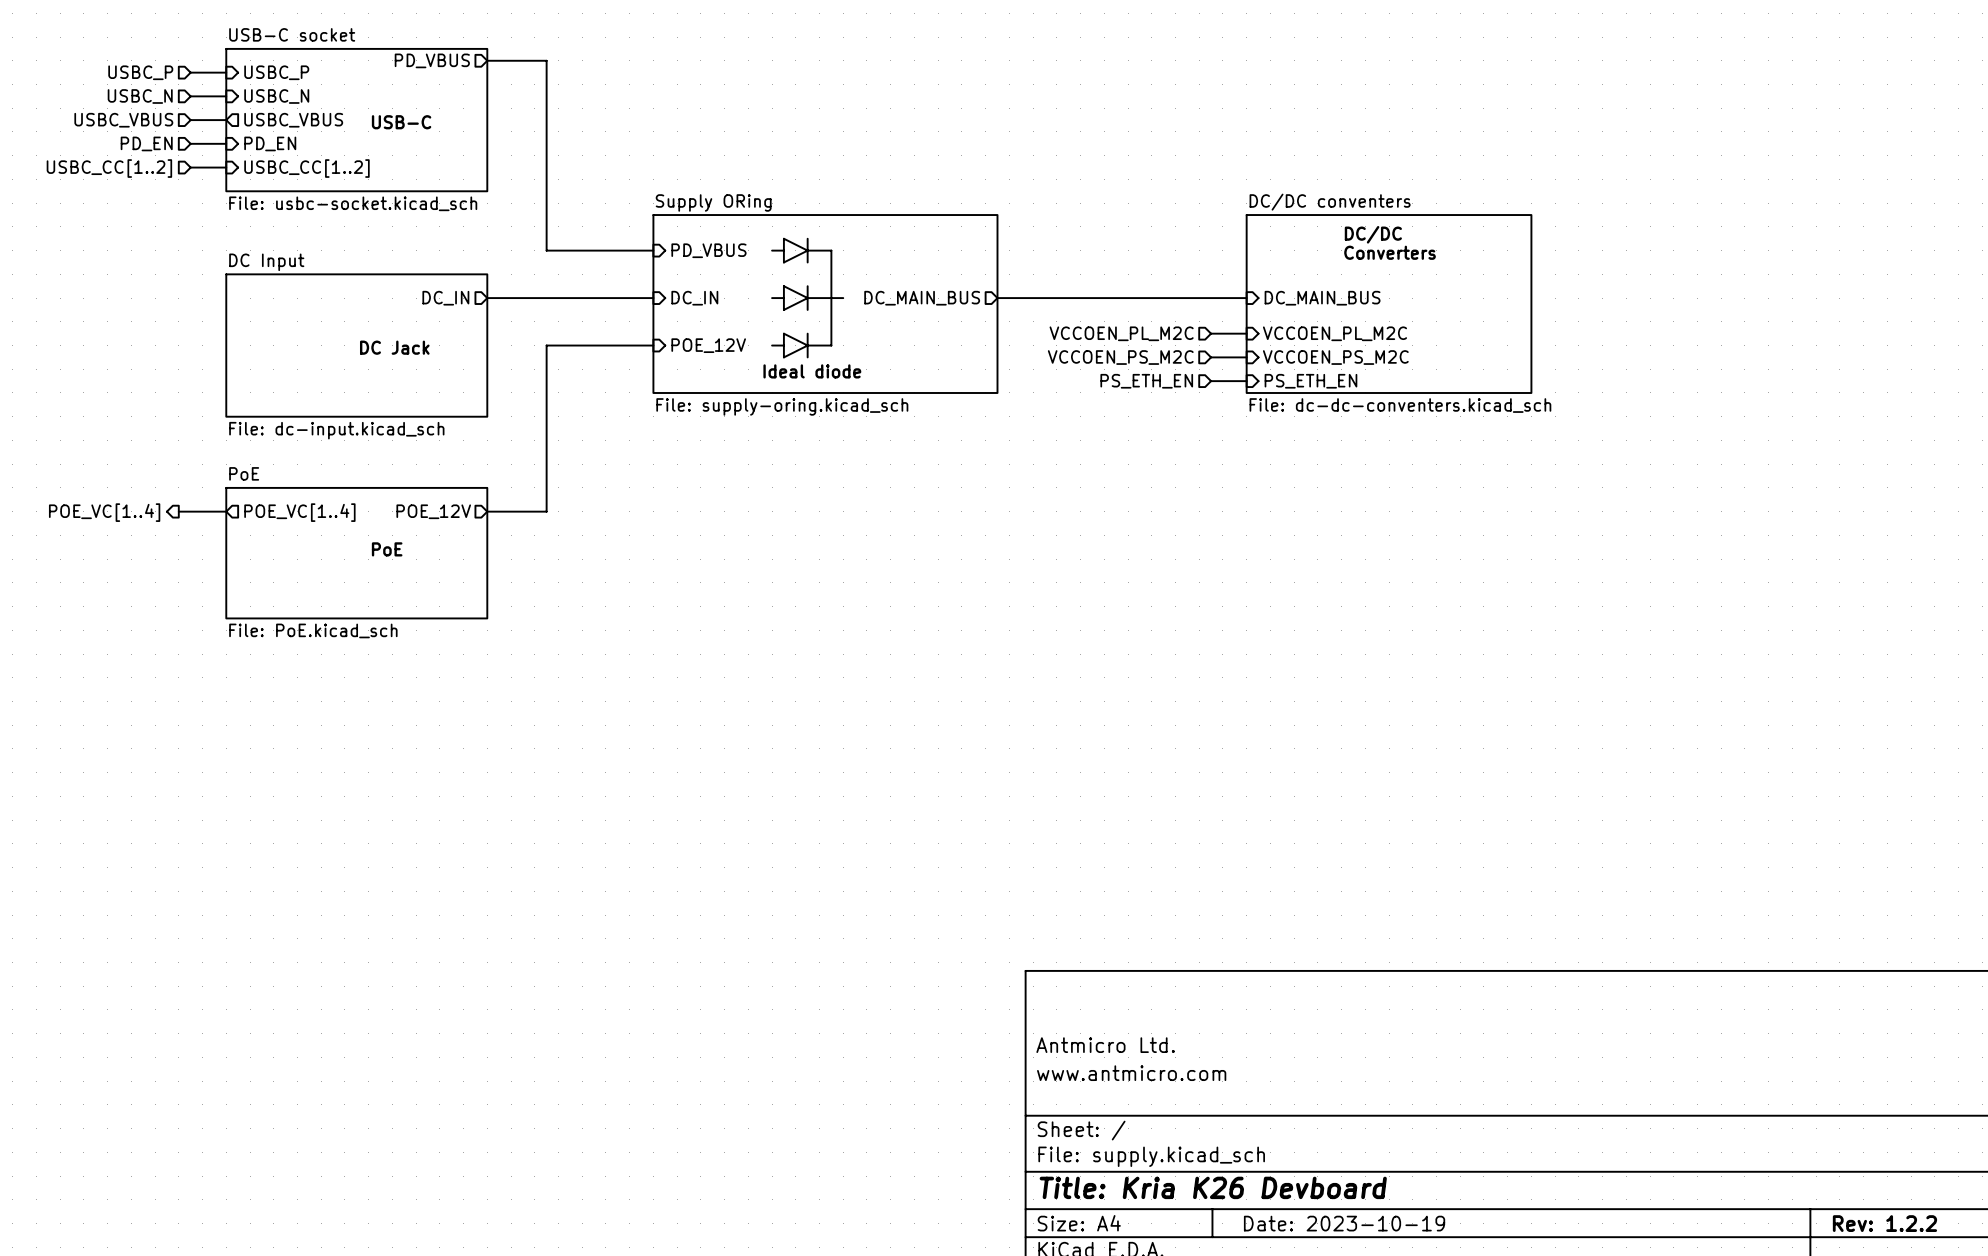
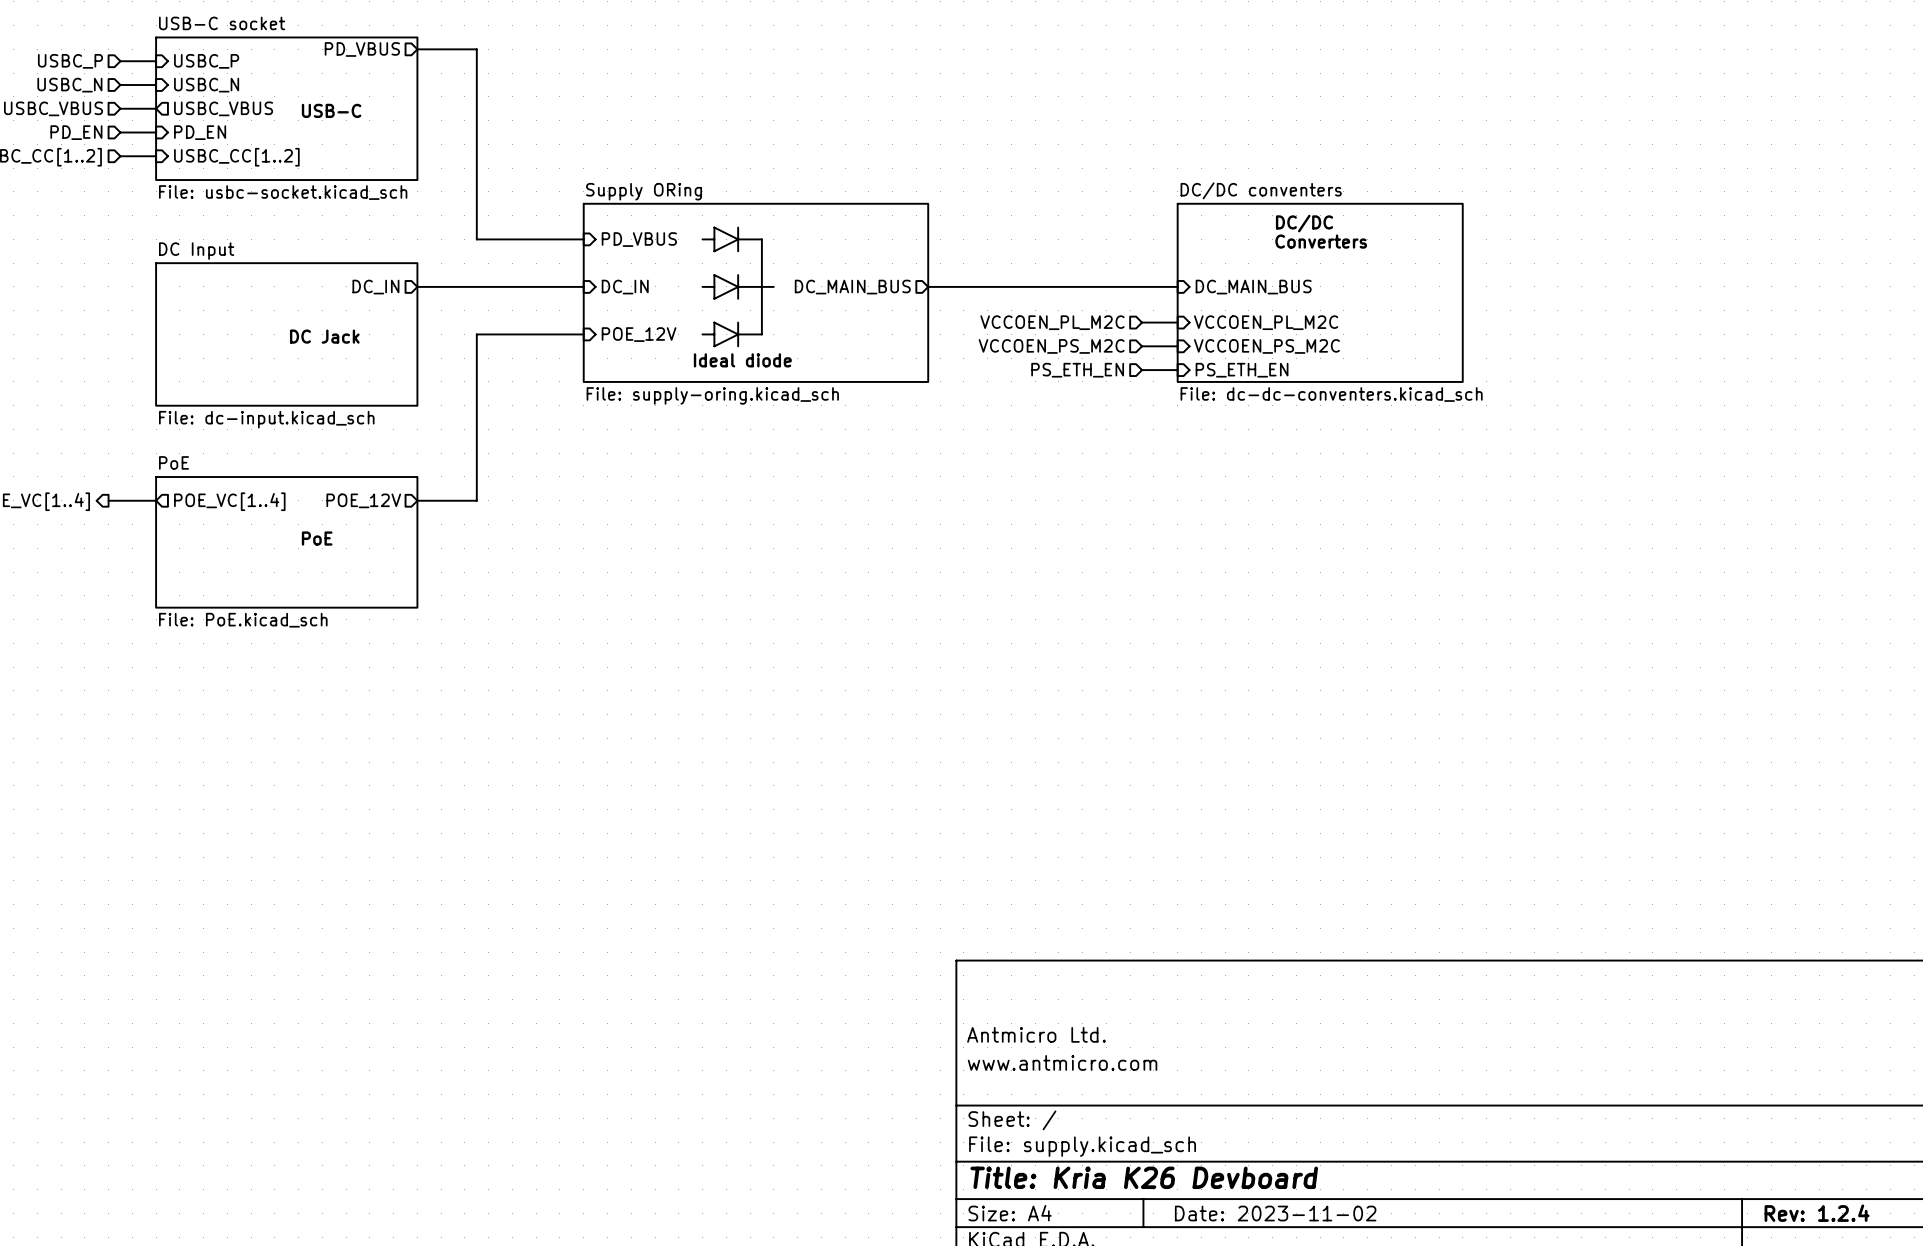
title block: Date: 2023-10-19 (1344, 1223) -> Date: 2023-11-02 (1275, 1213)
title block: Rev: 1.2.2 (1884, 1223) -> Rev: 1.2.4 (1817, 1213)

